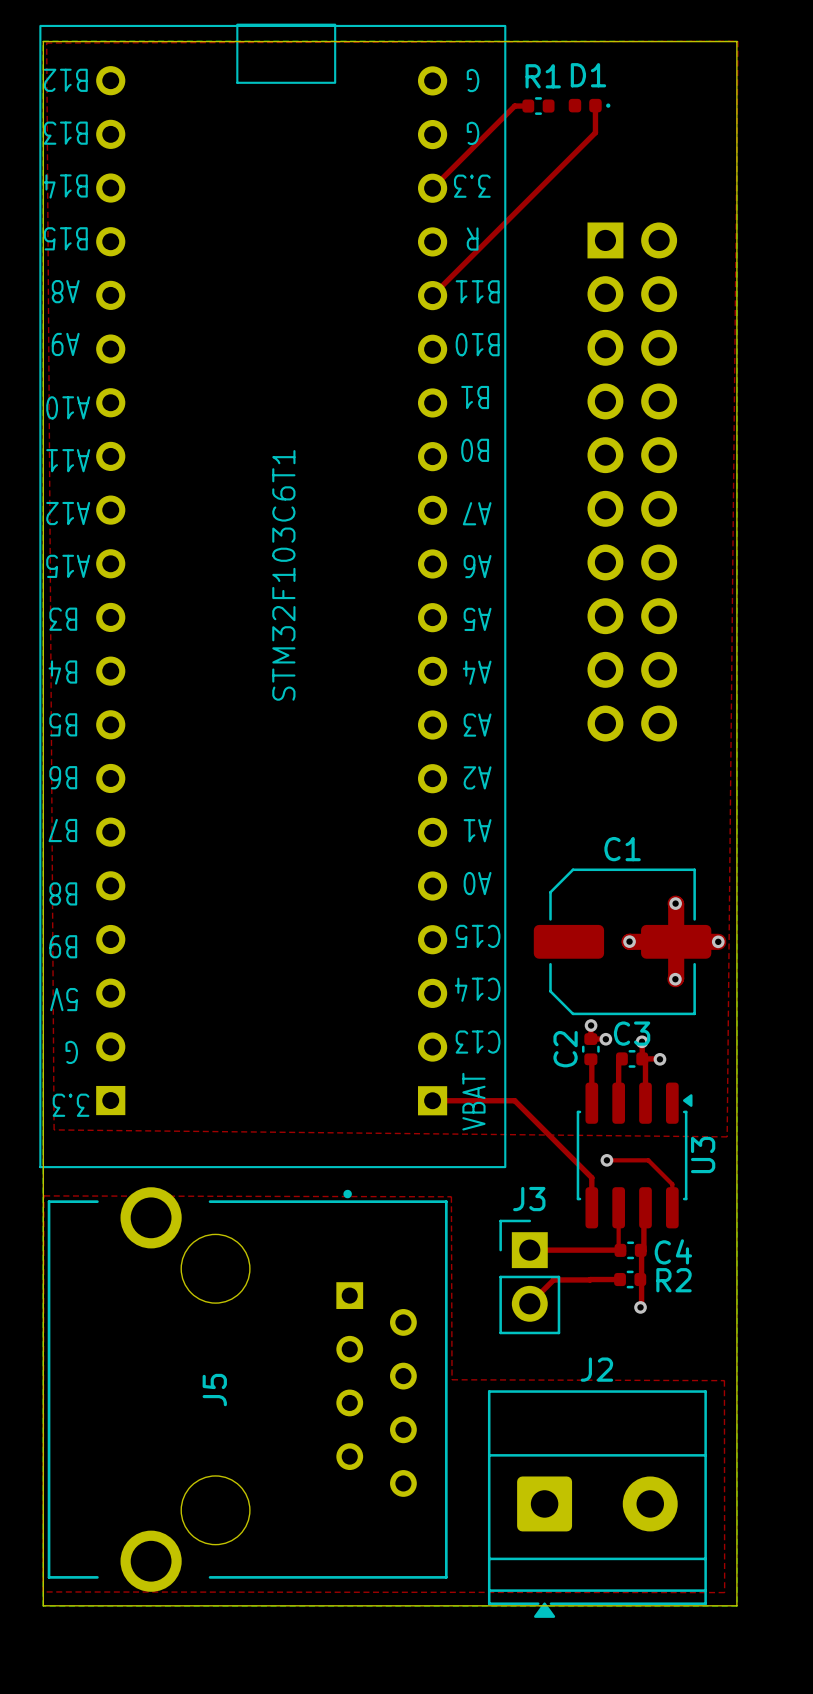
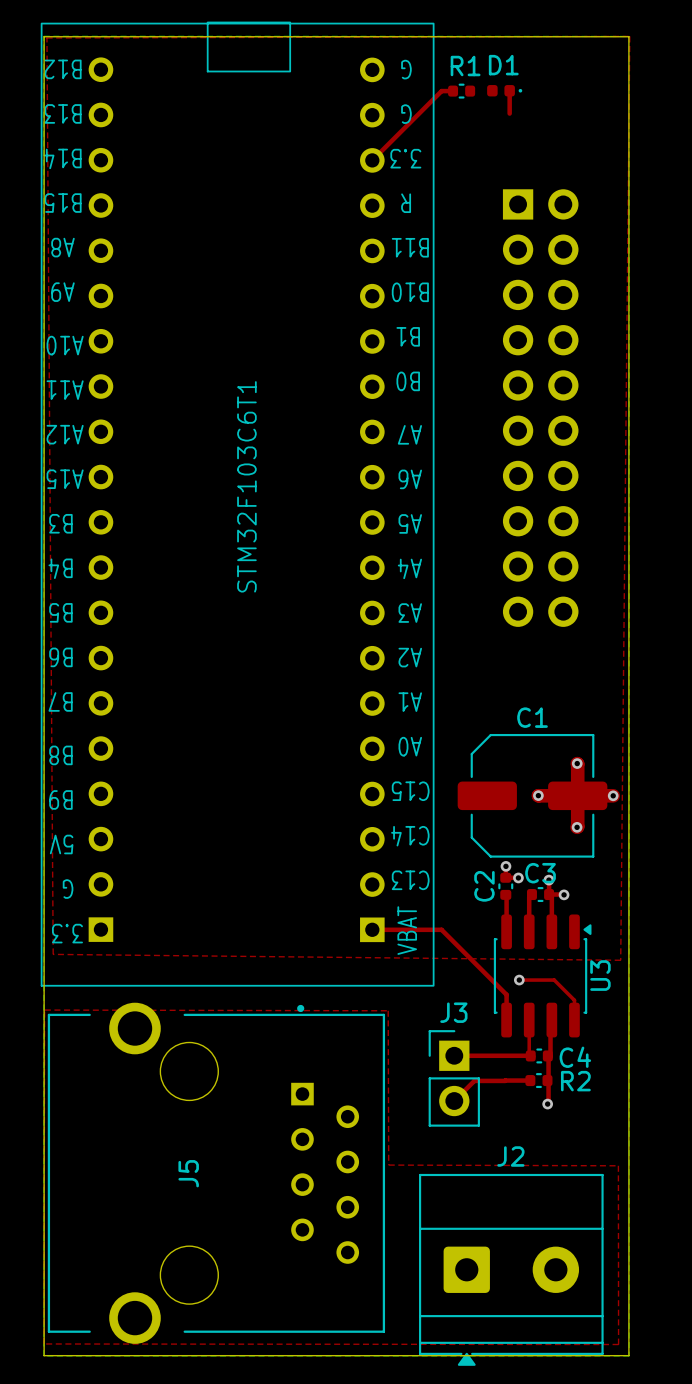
top track: (595, 132) (432, 295) -> none

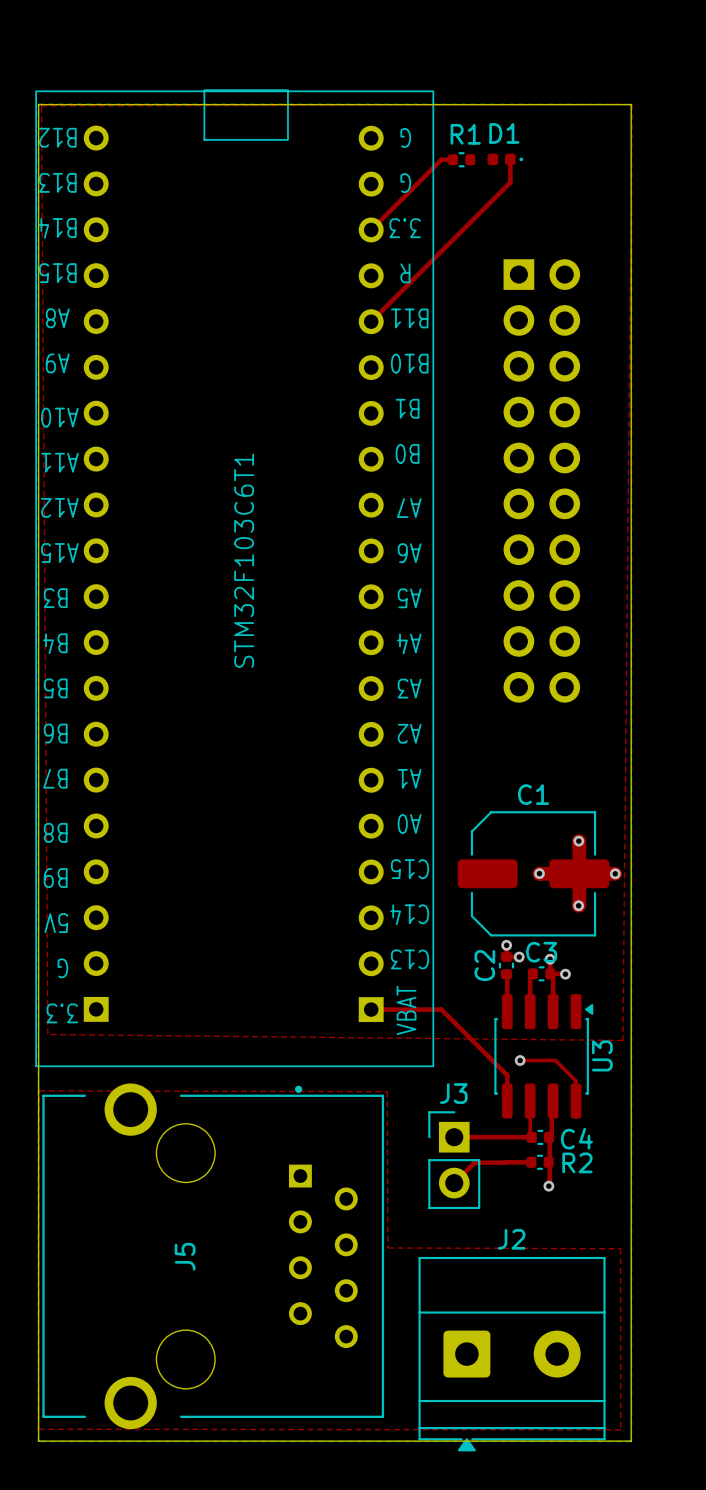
top track: none -> (510, 182) (371, 321)

